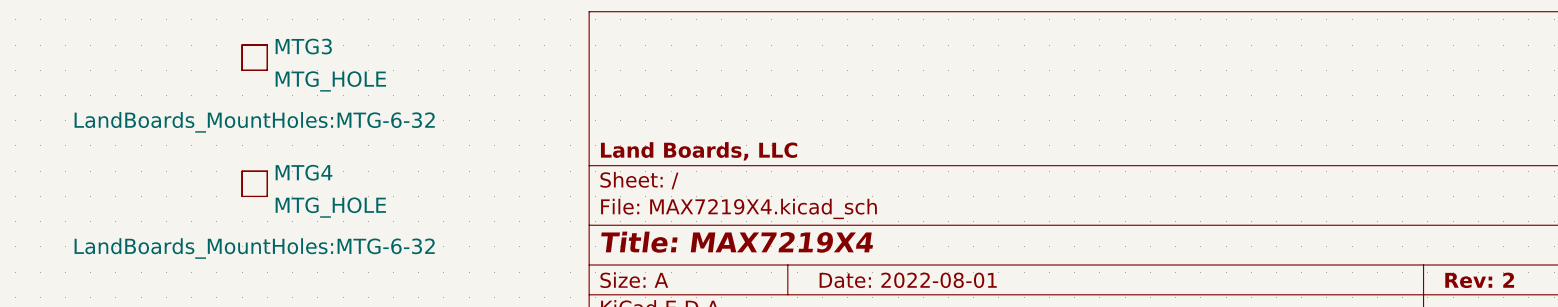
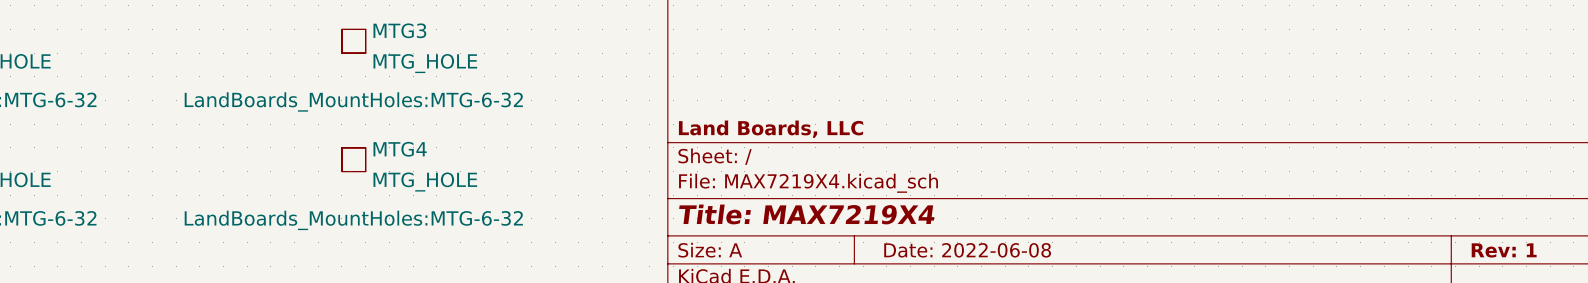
title block: Date: 2022-08-01 (908, 280) -> Date: 2022-06-08 (967, 250)
title block: Rev: 2 (1479, 280) -> Rev: 1 (1504, 250)

